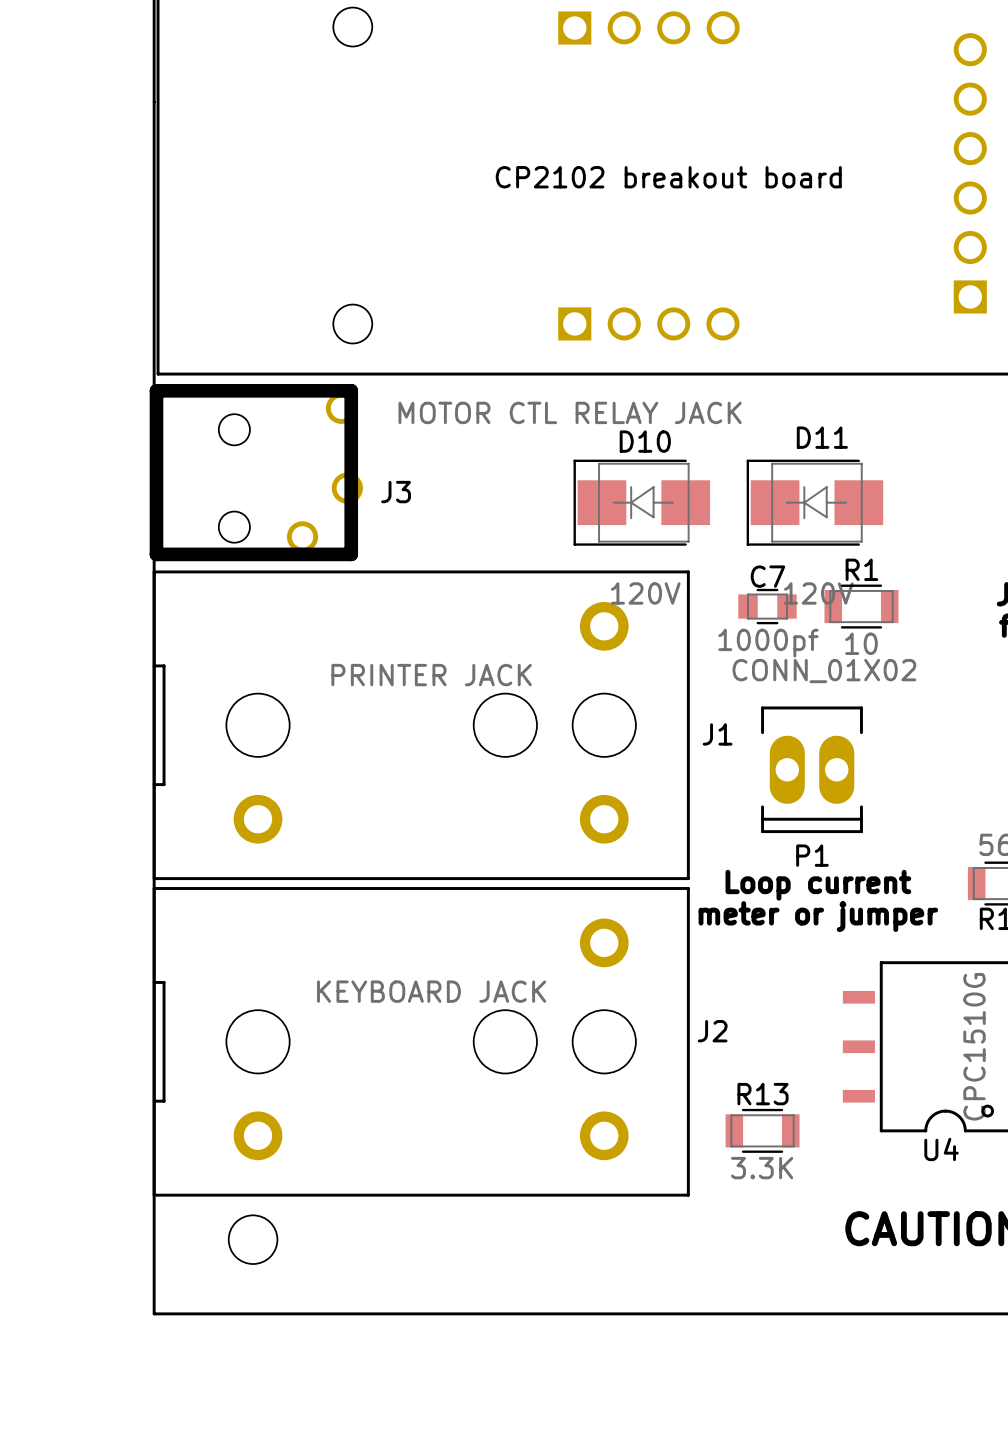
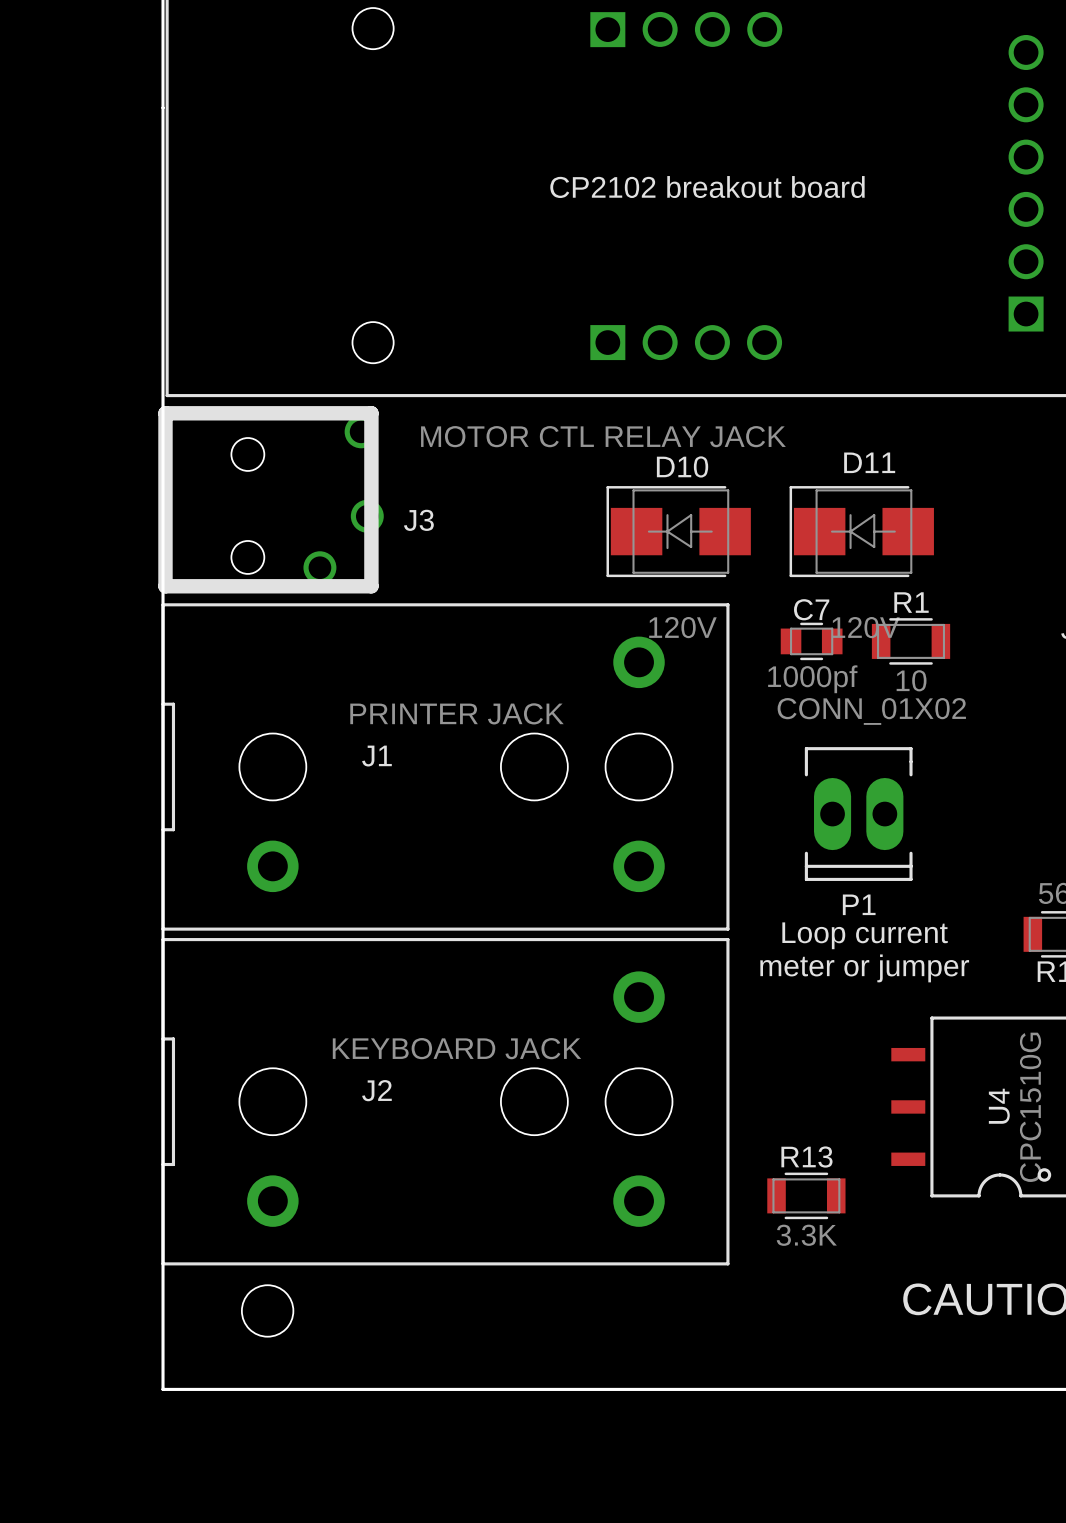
J1 name position: J1 (717, 734) -> J1 (376, 756)
J2 name position: J2 (712, 1031) -> J2 (376, 1090)
U4 name rotation: 0° (941, 1149) -> 90° counterclockwise (999, 1106)
U4 name position: U4 (941, 1149) -> U4 (999, 1106)

